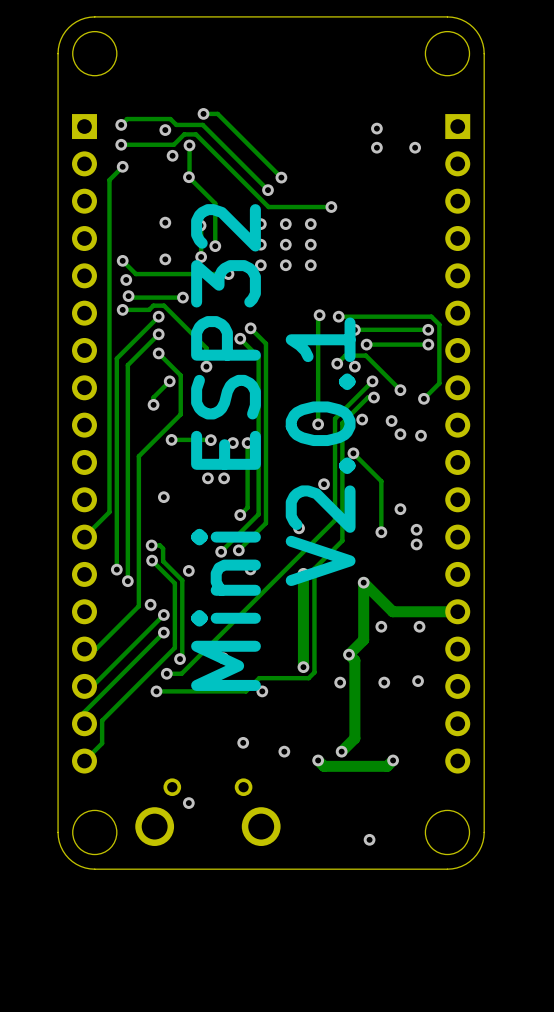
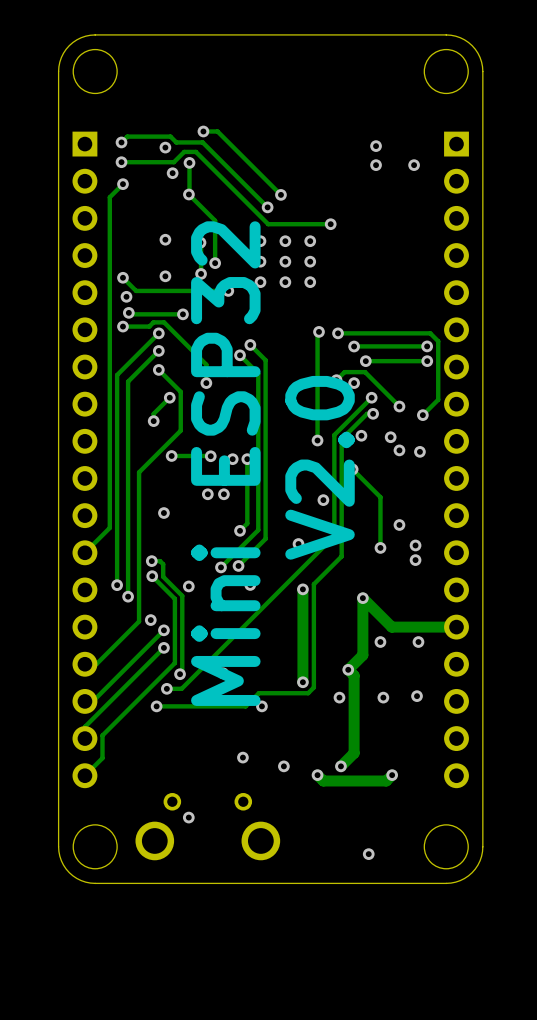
text: V2.0.1 (320, 451) -> V2.0 (320, 467)

